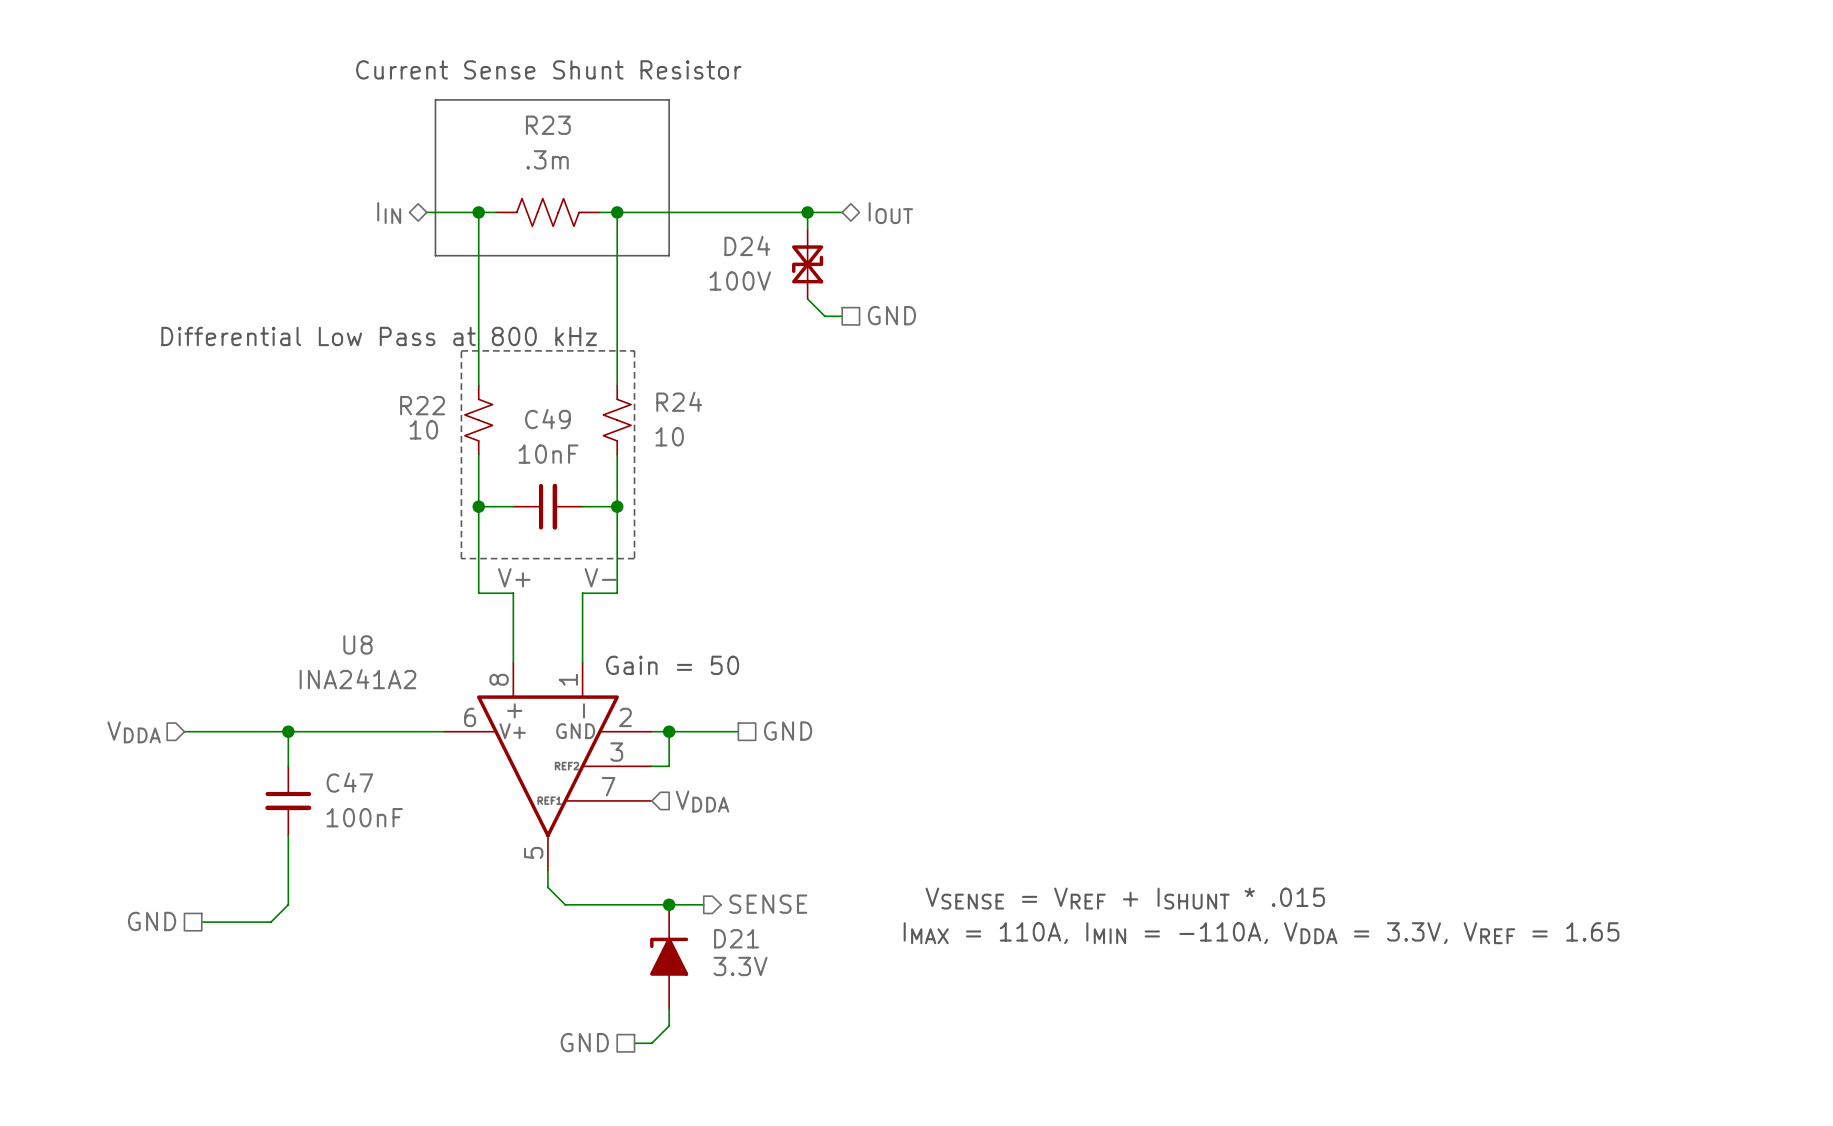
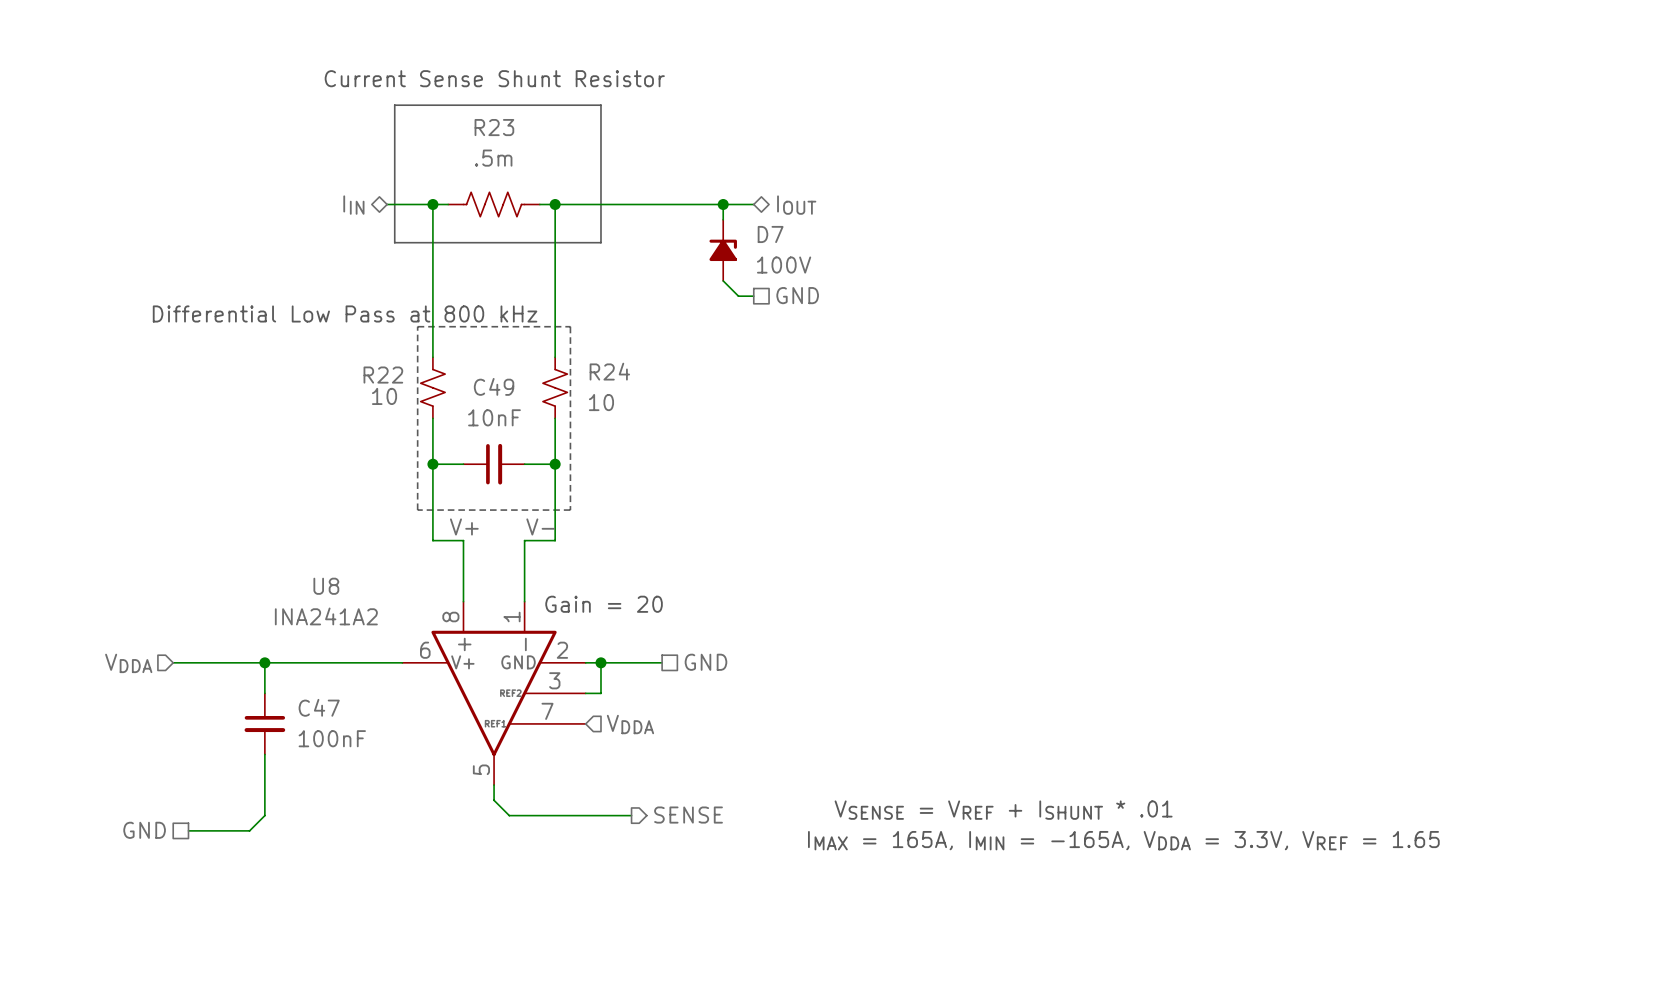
R23 value: .3m (547, 159) -> .5m (493, 158)
D24: 100V (807, 264) -> none
D7: none -> 100V (723, 250)
text: Gain = 50 (672, 665) -> Gain = 20 (604, 604)
text: VSENSE = VREF + ISHUNT * .015 (1125, 898) -> VSENSE = VREF + ISHUNT * .01 (1003, 810)
junction: (669, 904) -> none
text: IMAX = 110A, IMIN = -110A, VDDA = 3.3V, VREF = 1.65 (1261, 933) -> IMAX = 165A, IMIN = -165A, VDDA = 3.3V, VREF = 1.65 (1123, 840)
D21: 3.3V (669, 956) -> none
wire: (669, 1008) (669, 1025) (651, 1043) (634, 1043) -> none
hierarchical label: GND (584, 1042) -> none

